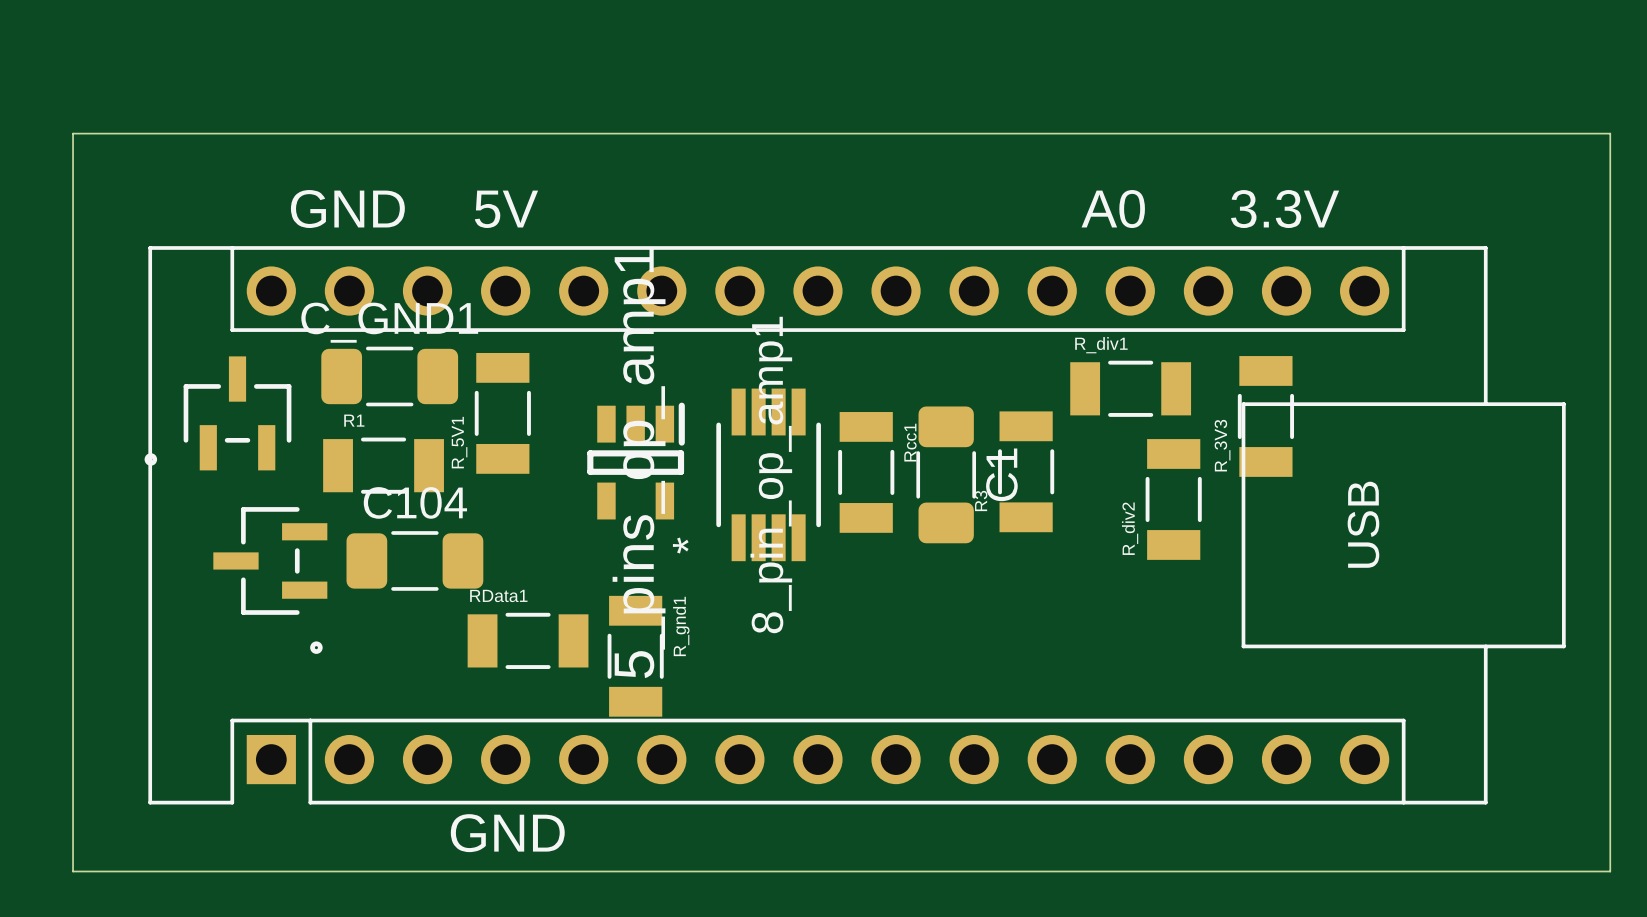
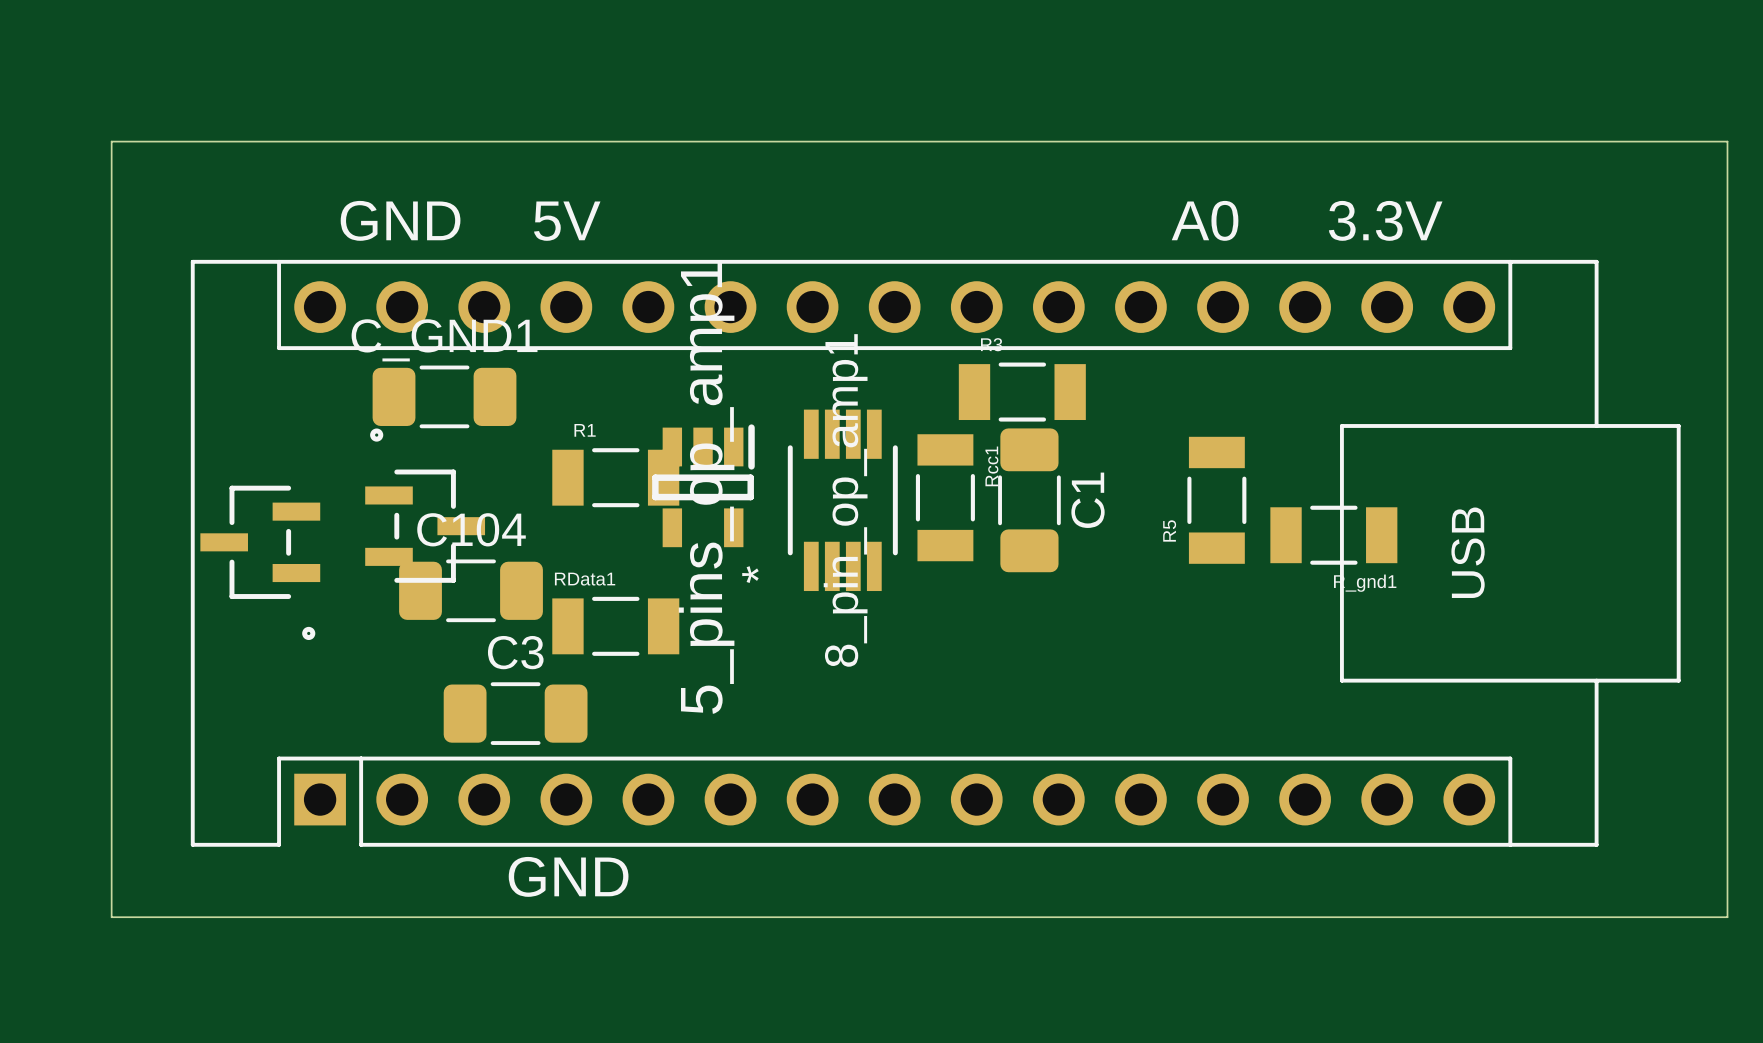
R_div1: (1130, 388) -> none
part: (217, 413) -> none
R_5V1: (502, 413) -> none
R_3V3: (1265, 416) -> none
R1 position: (383, 465) -> (615, 477)
R3 rotation: 0° (1026, 471) -> 90° clockwise (1022, 392)
R3 position: (1026, 471) -> (1022, 392)
R5: none -> (1216, 500)
part: none -> (425, 505)
R_div2: (1173, 499) -> none
part: none -> (260, 562)
part: (270, 580) -> none
RData1 position: (528, 640) -> (615, 626)
R_gnd1 rotation: 0° (635, 656) -> 90° clockwise (1333, 535)
R_gnd1 position: (635, 656) -> (1333, 535)
C3: none -> (515, 713)

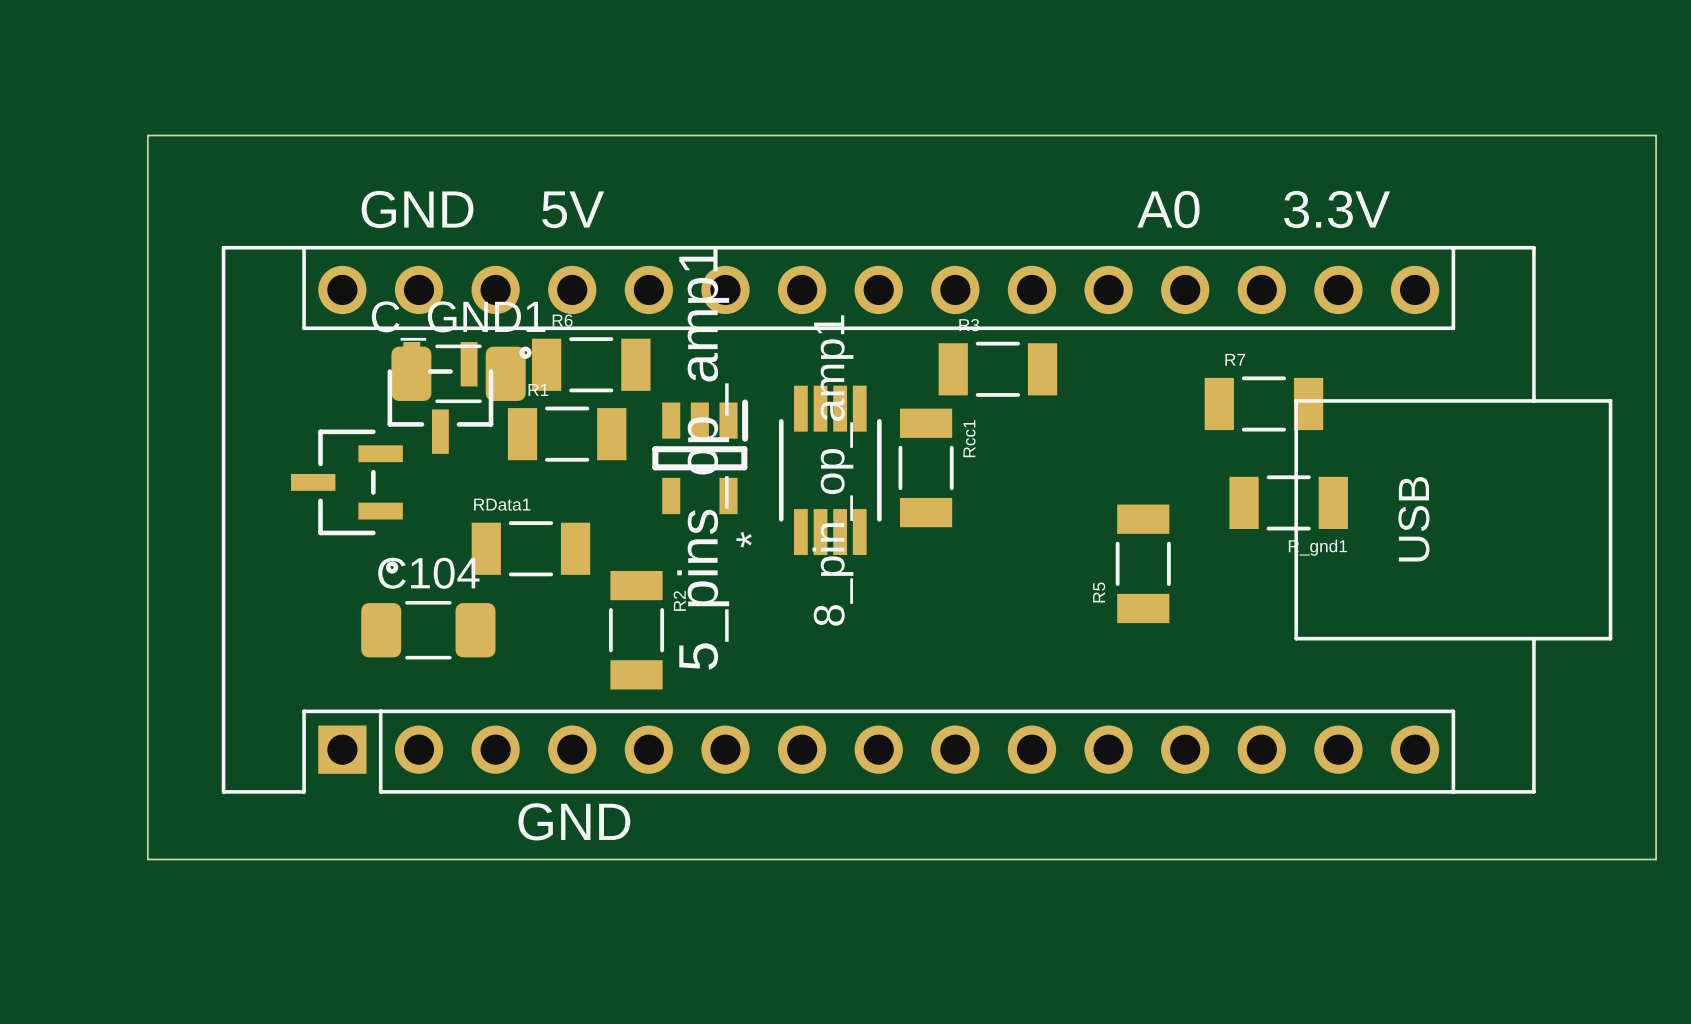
R6: none -> (591, 364)
part: none -> (459, 397)
R7: none -> (1263, 403)
R1 position: (615, 477) -> (567, 434)
C1: (1029, 500) -> none
R5 position: (1216, 500) -> (1143, 563)
part: (425, 505) -> none
part: none -> (346, 501)
part: (260, 562) -> none
C104 position: (471, 590) -> (428, 630)
RData1 position: (615, 626) -> (530, 548)
R2: none -> (636, 630)
C3: (515, 713) -> none

